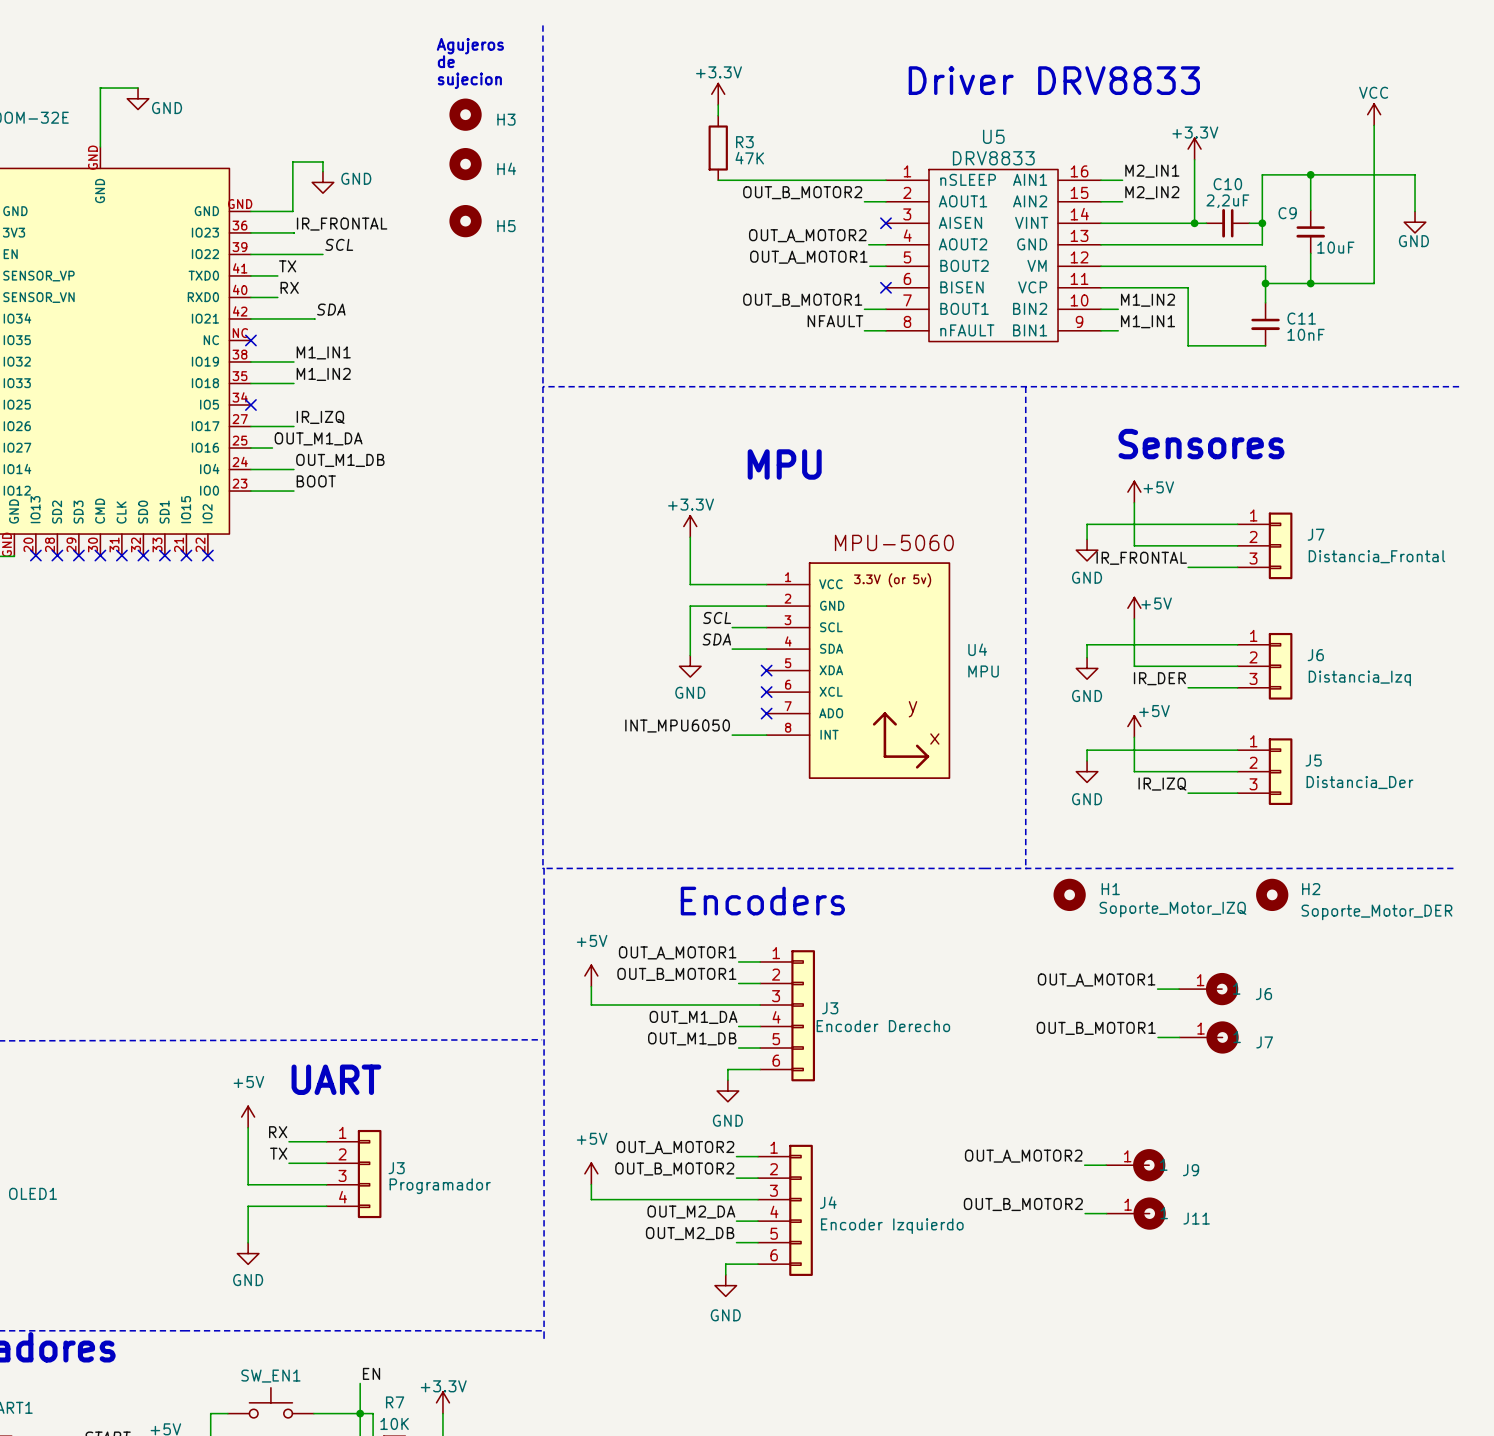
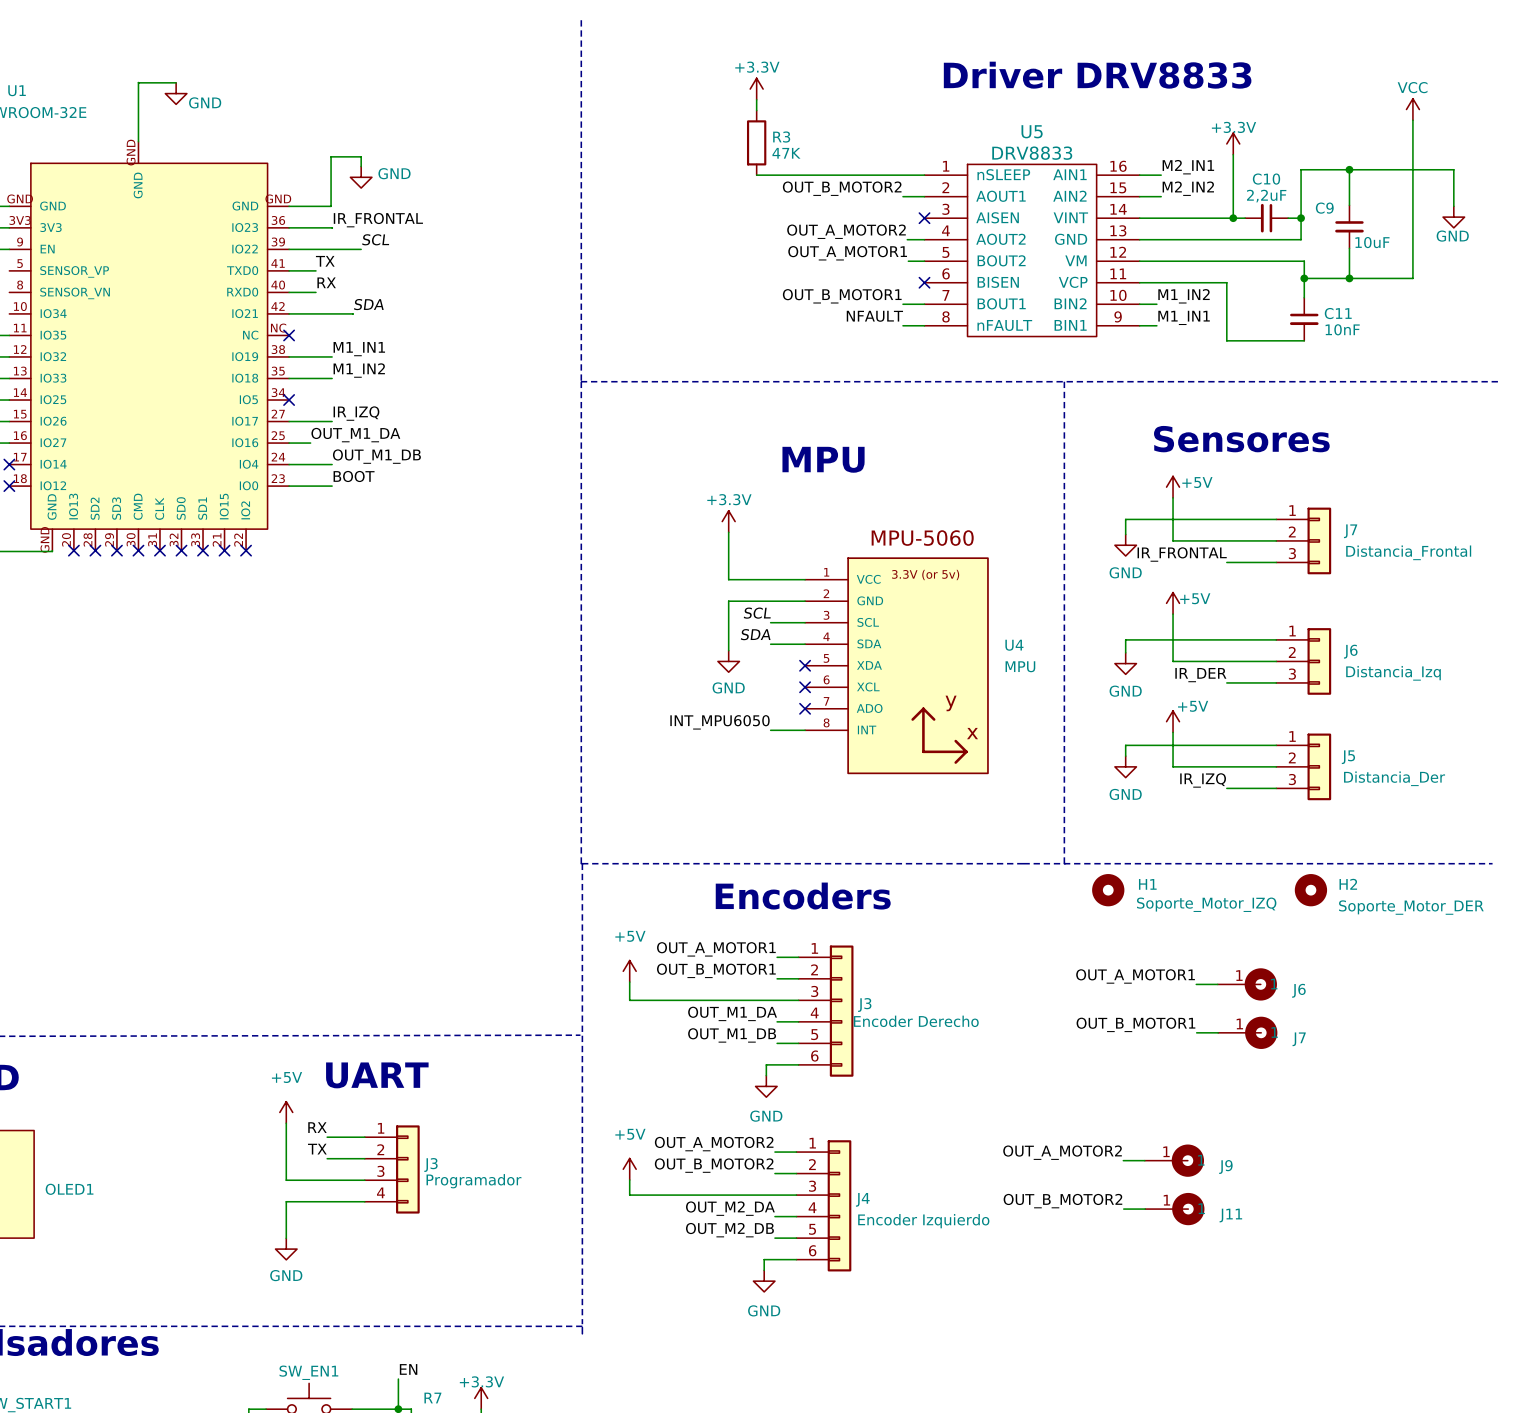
text: Agujeros (470, 46) -> none
text: de (446, 61) -> none
text: sujecion (469, 80) -> none
H3: (465, 114) -> none
H4: (465, 164) -> none
H5: (465, 221) -> none

